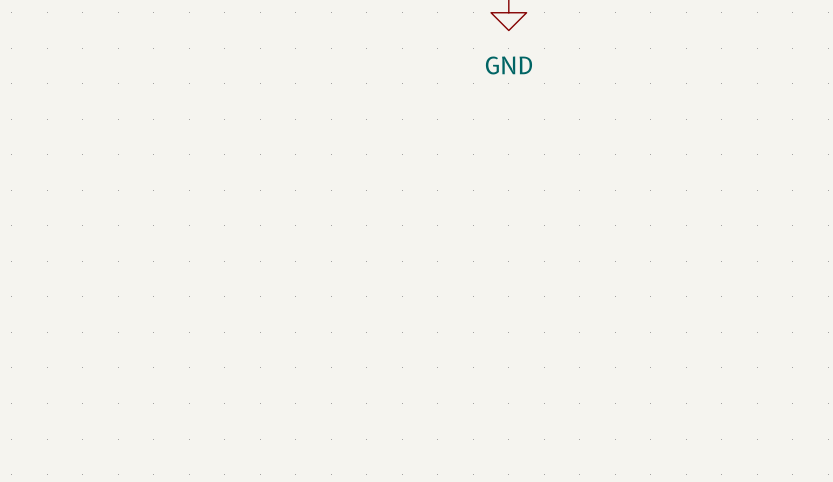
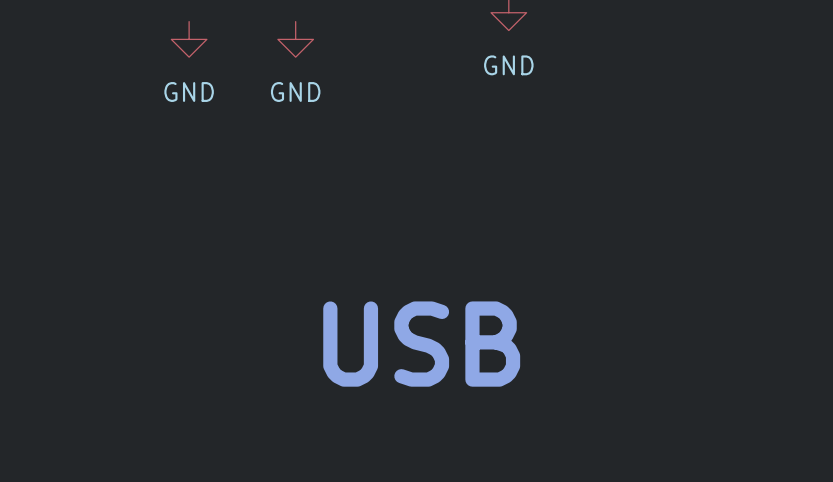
power symbol: none -> GND (189, 39)
power symbol: none -> GND (295, 39)
text: none -> USB (421, 344)

